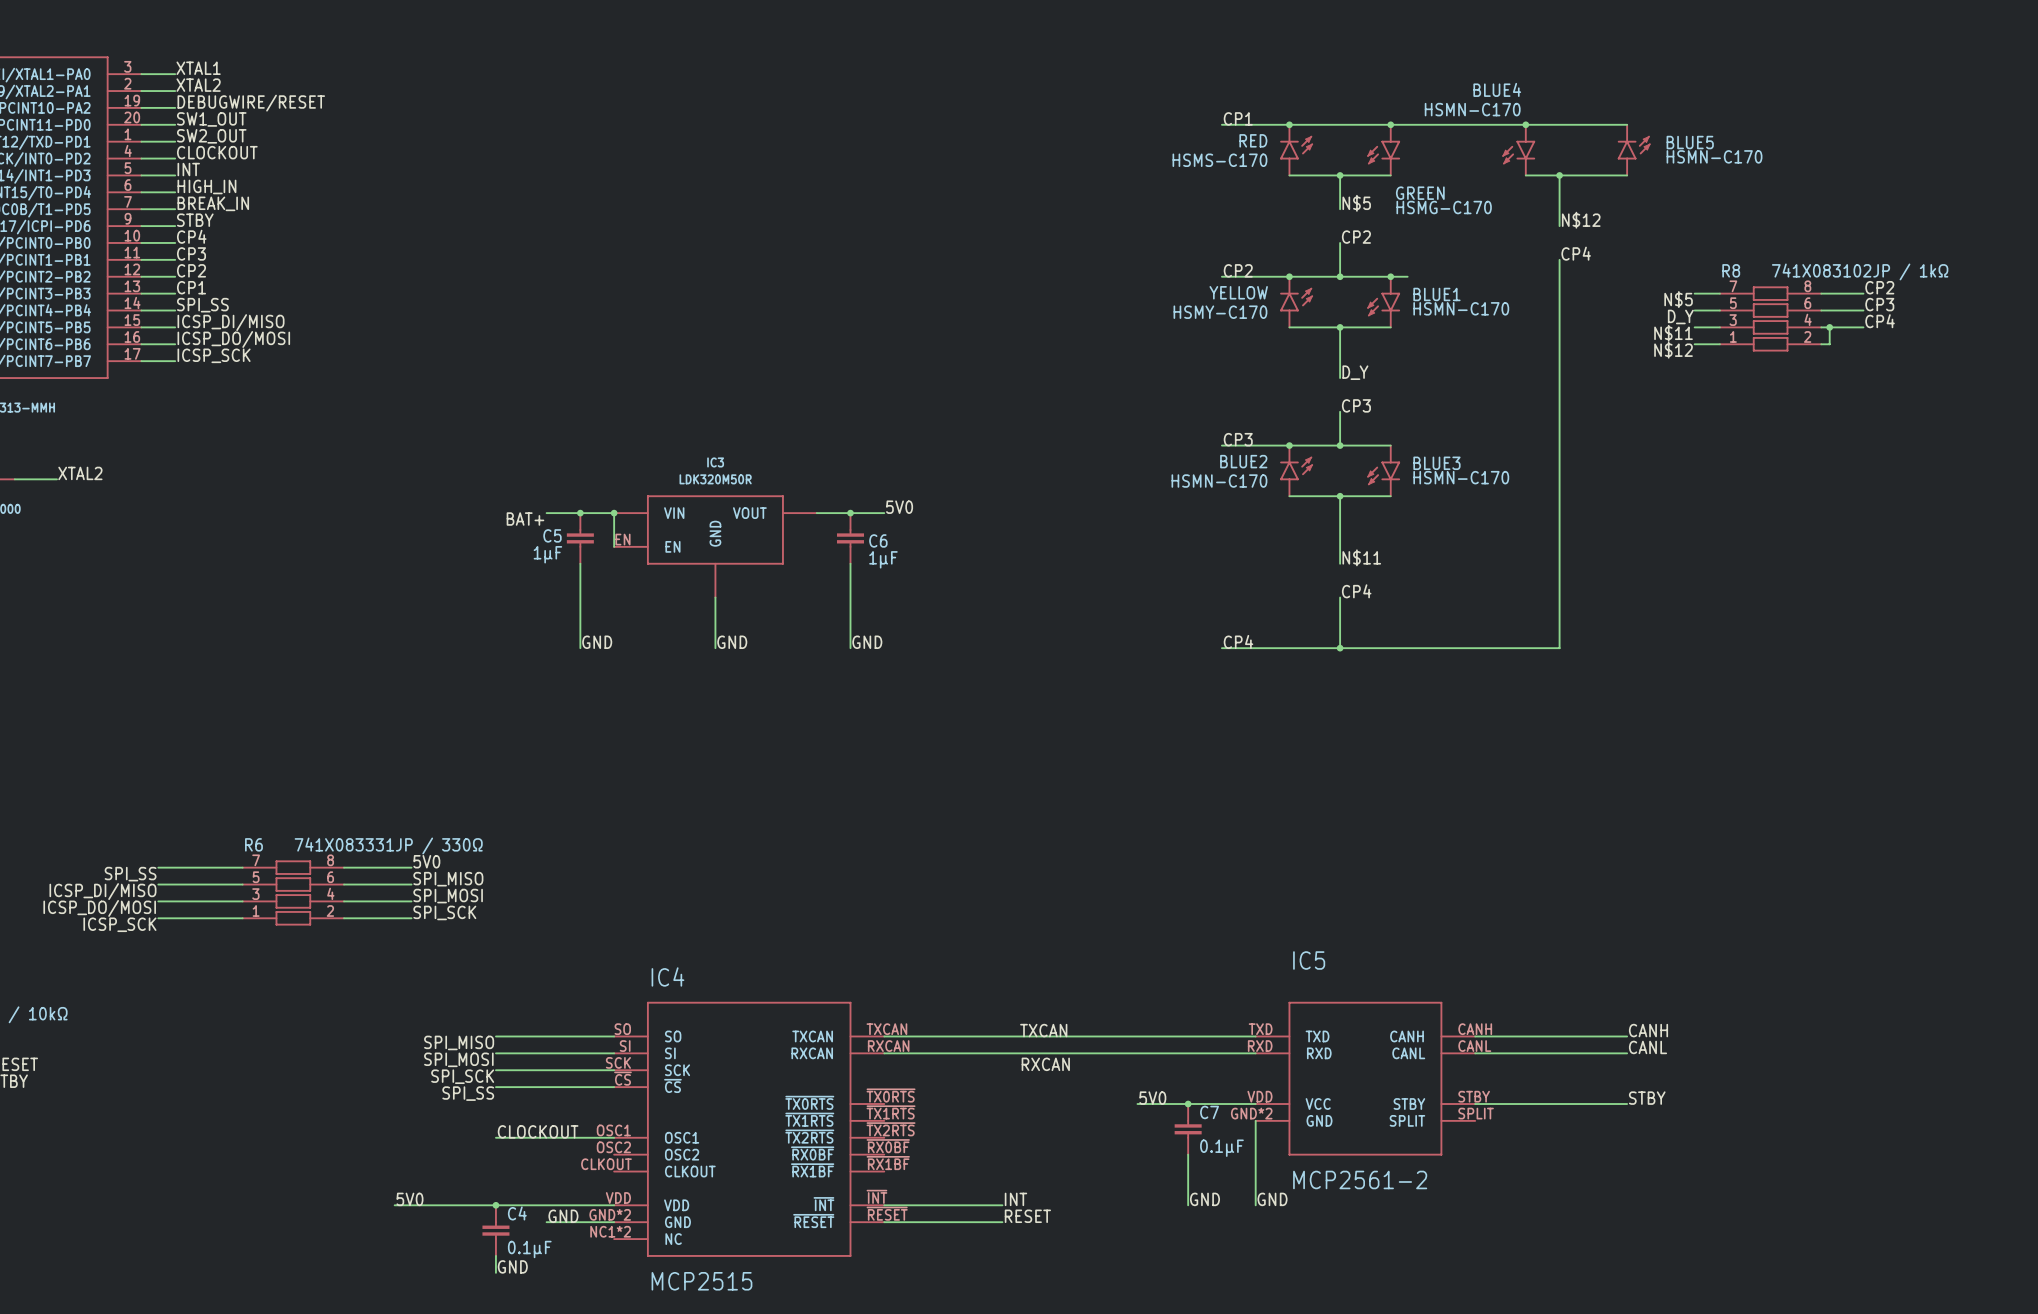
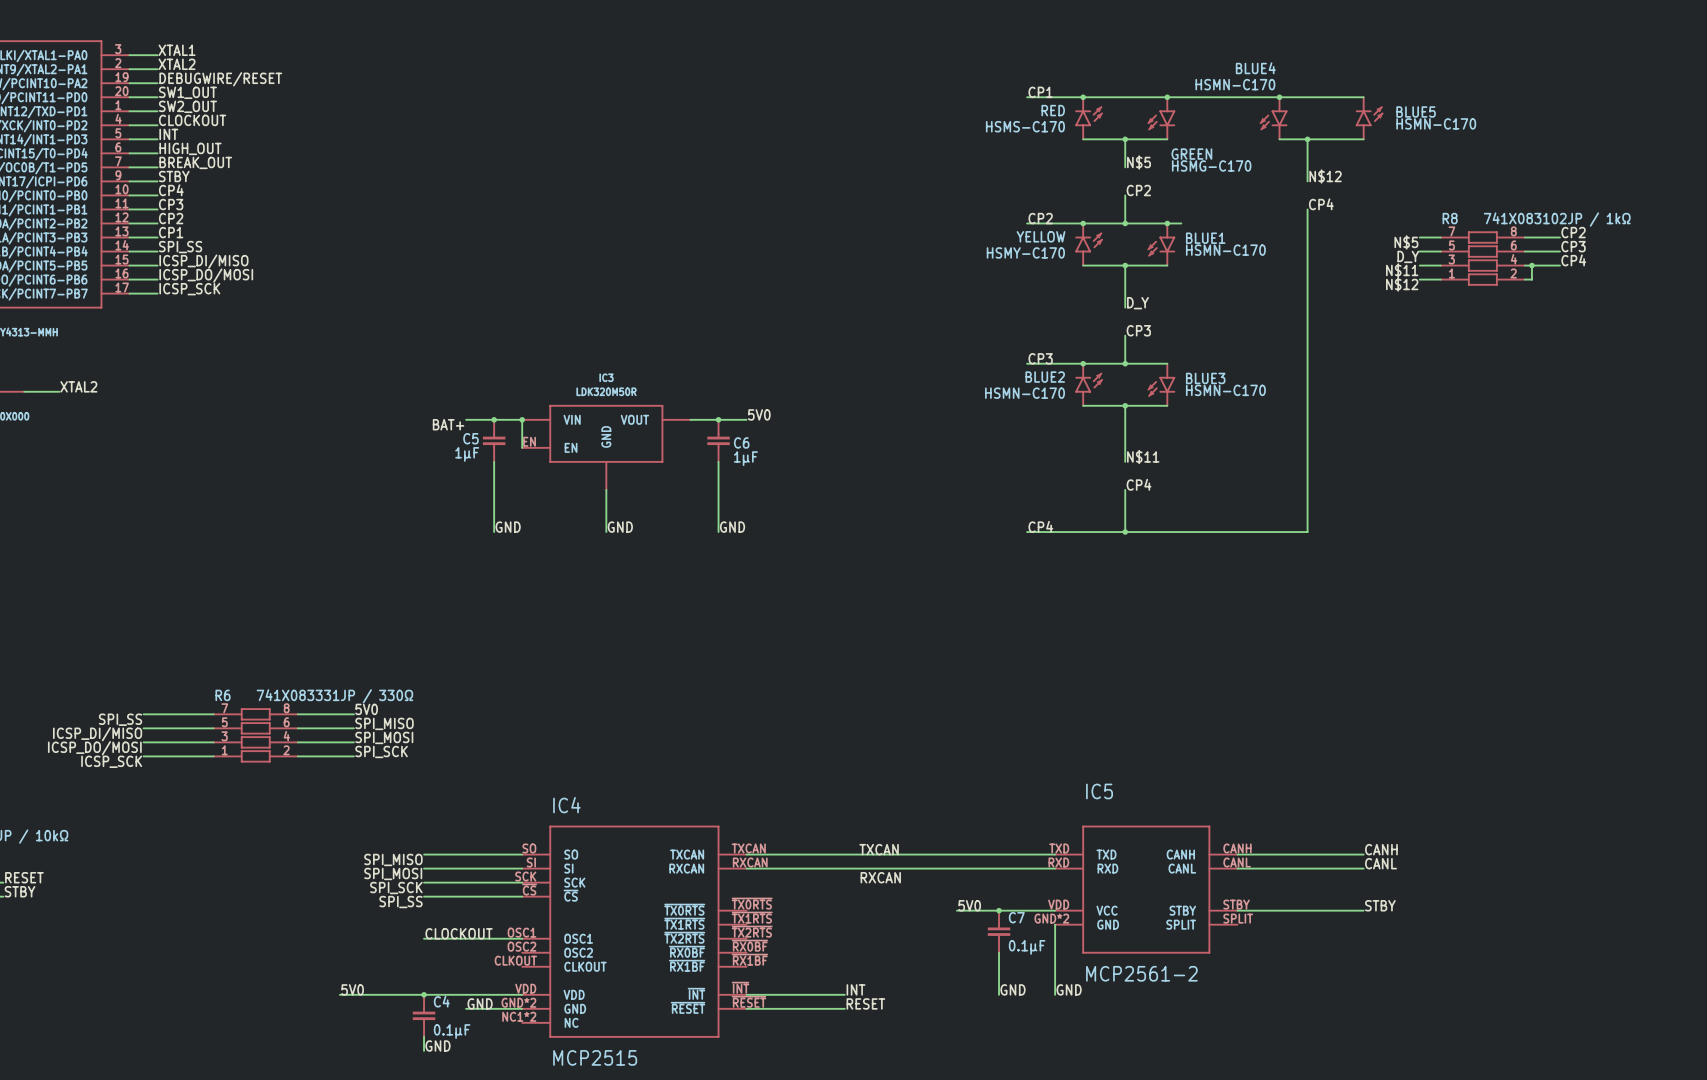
label: HIGH_IN (206, 186) -> HIGH_OUT (190, 148)
label: BREAK_IN (213, 203) -> BREAK_OUT (195, 162)

